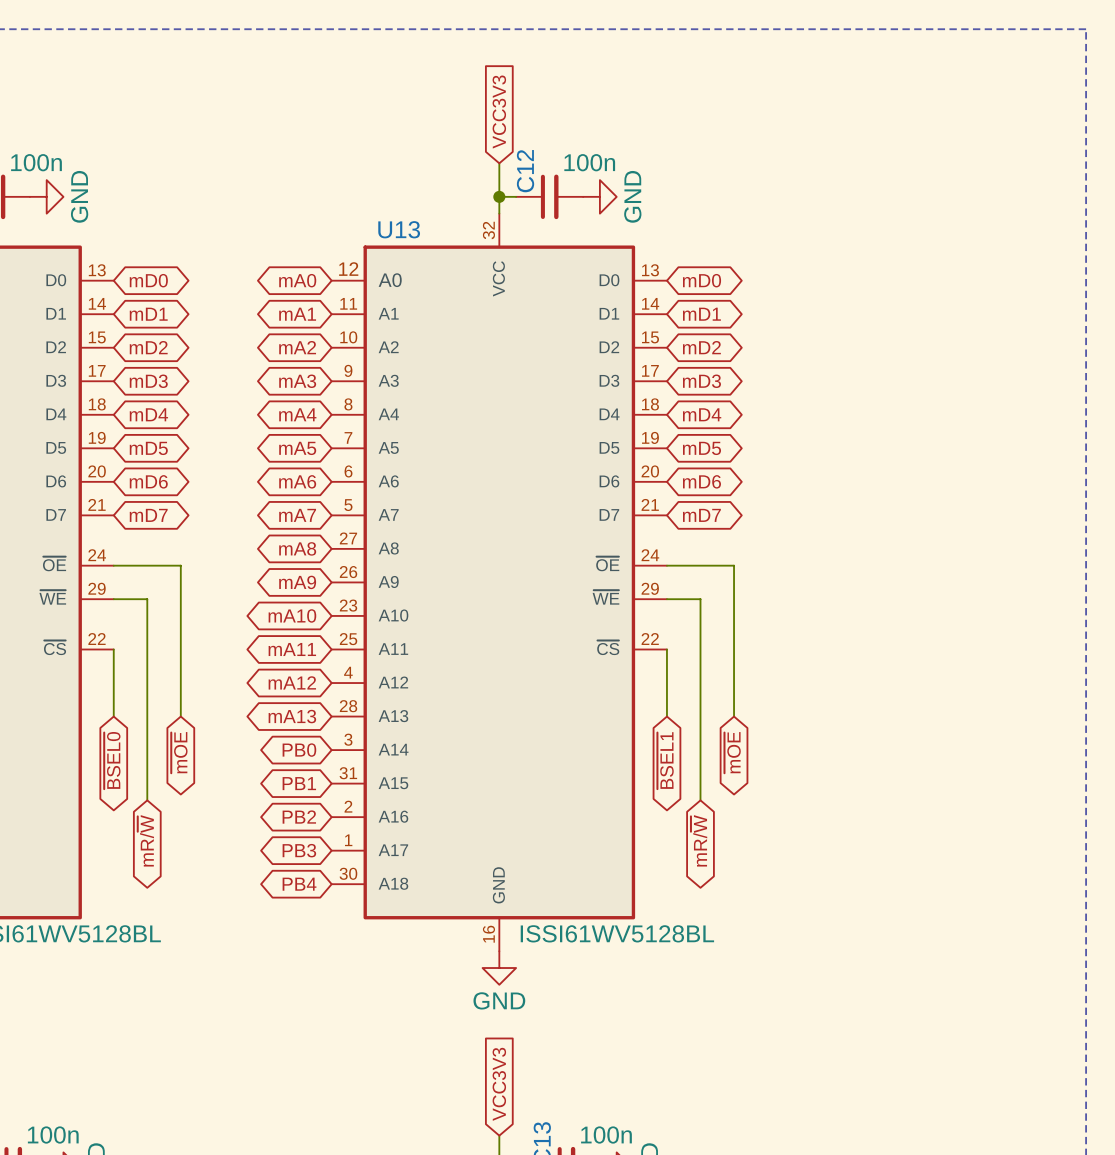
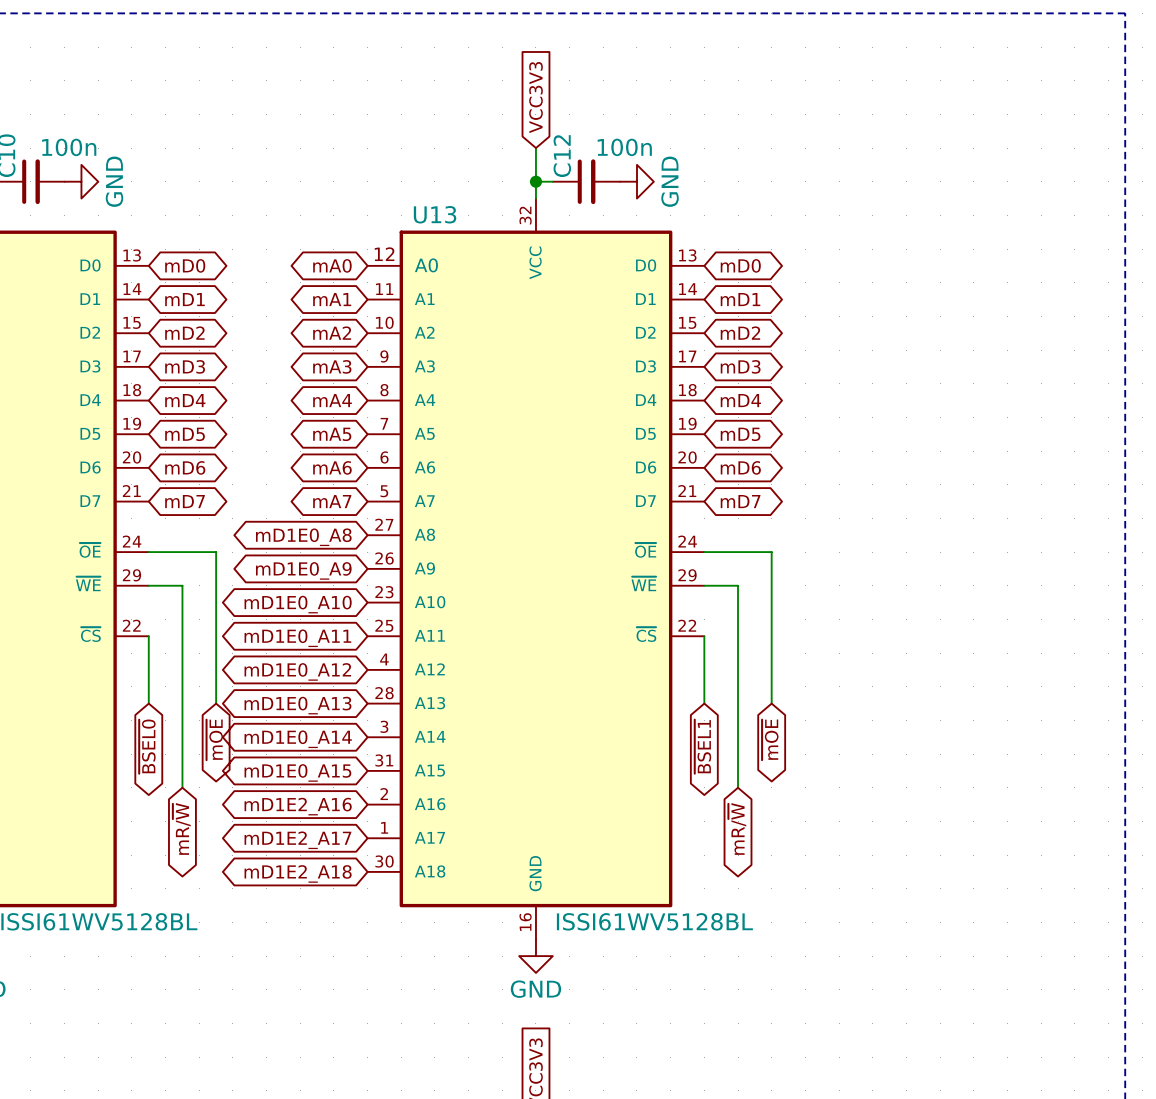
global label: mA8 (297, 548) -> mD1E0_A8 (303, 537)
global label: mA9 (297, 582) -> mD1E0_A9 (303, 570)
global label: mA10 (292, 615) -> mD1E0_A10 (298, 604)
global label: mA11 (292, 649) -> mD1E0_A11 (297, 638)
global label: mA12 (292, 682) -> mD1E0_A12 (297, 671)
global label: mA13 (292, 716) -> mD1E0_A13 (297, 705)
global label: PB0 (299, 750) -> mD1E0_A14 (298, 739)
global label: PB1 (299, 783) -> mD1E0_A15 (297, 772)
global label: PB2 (299, 817) -> mD1E2_A16 (298, 806)
global label: PB3 (299, 850) -> mD1E2_A17 (297, 840)
global label: PB4 (299, 884) -> mD1E2_A18 (298, 873)

